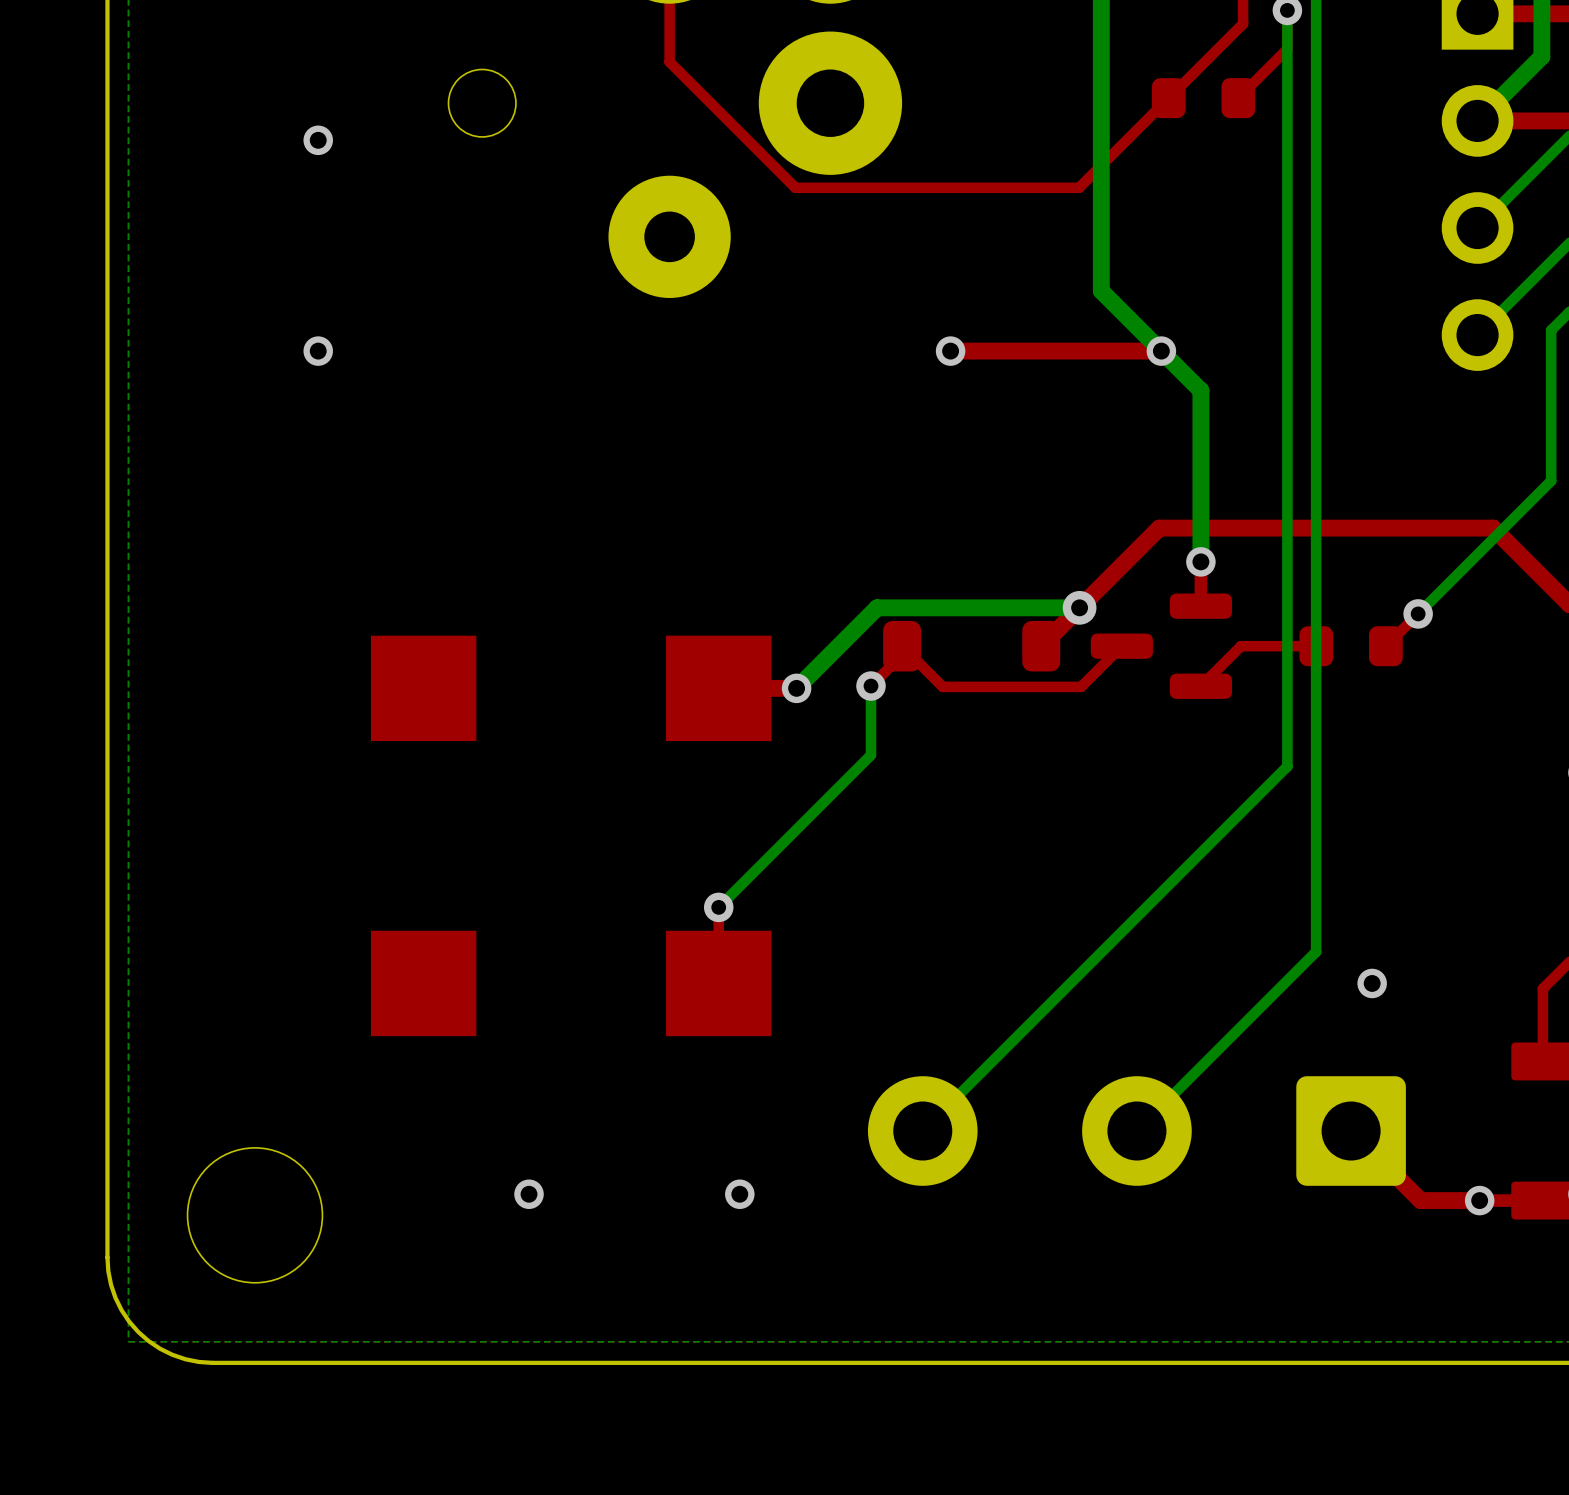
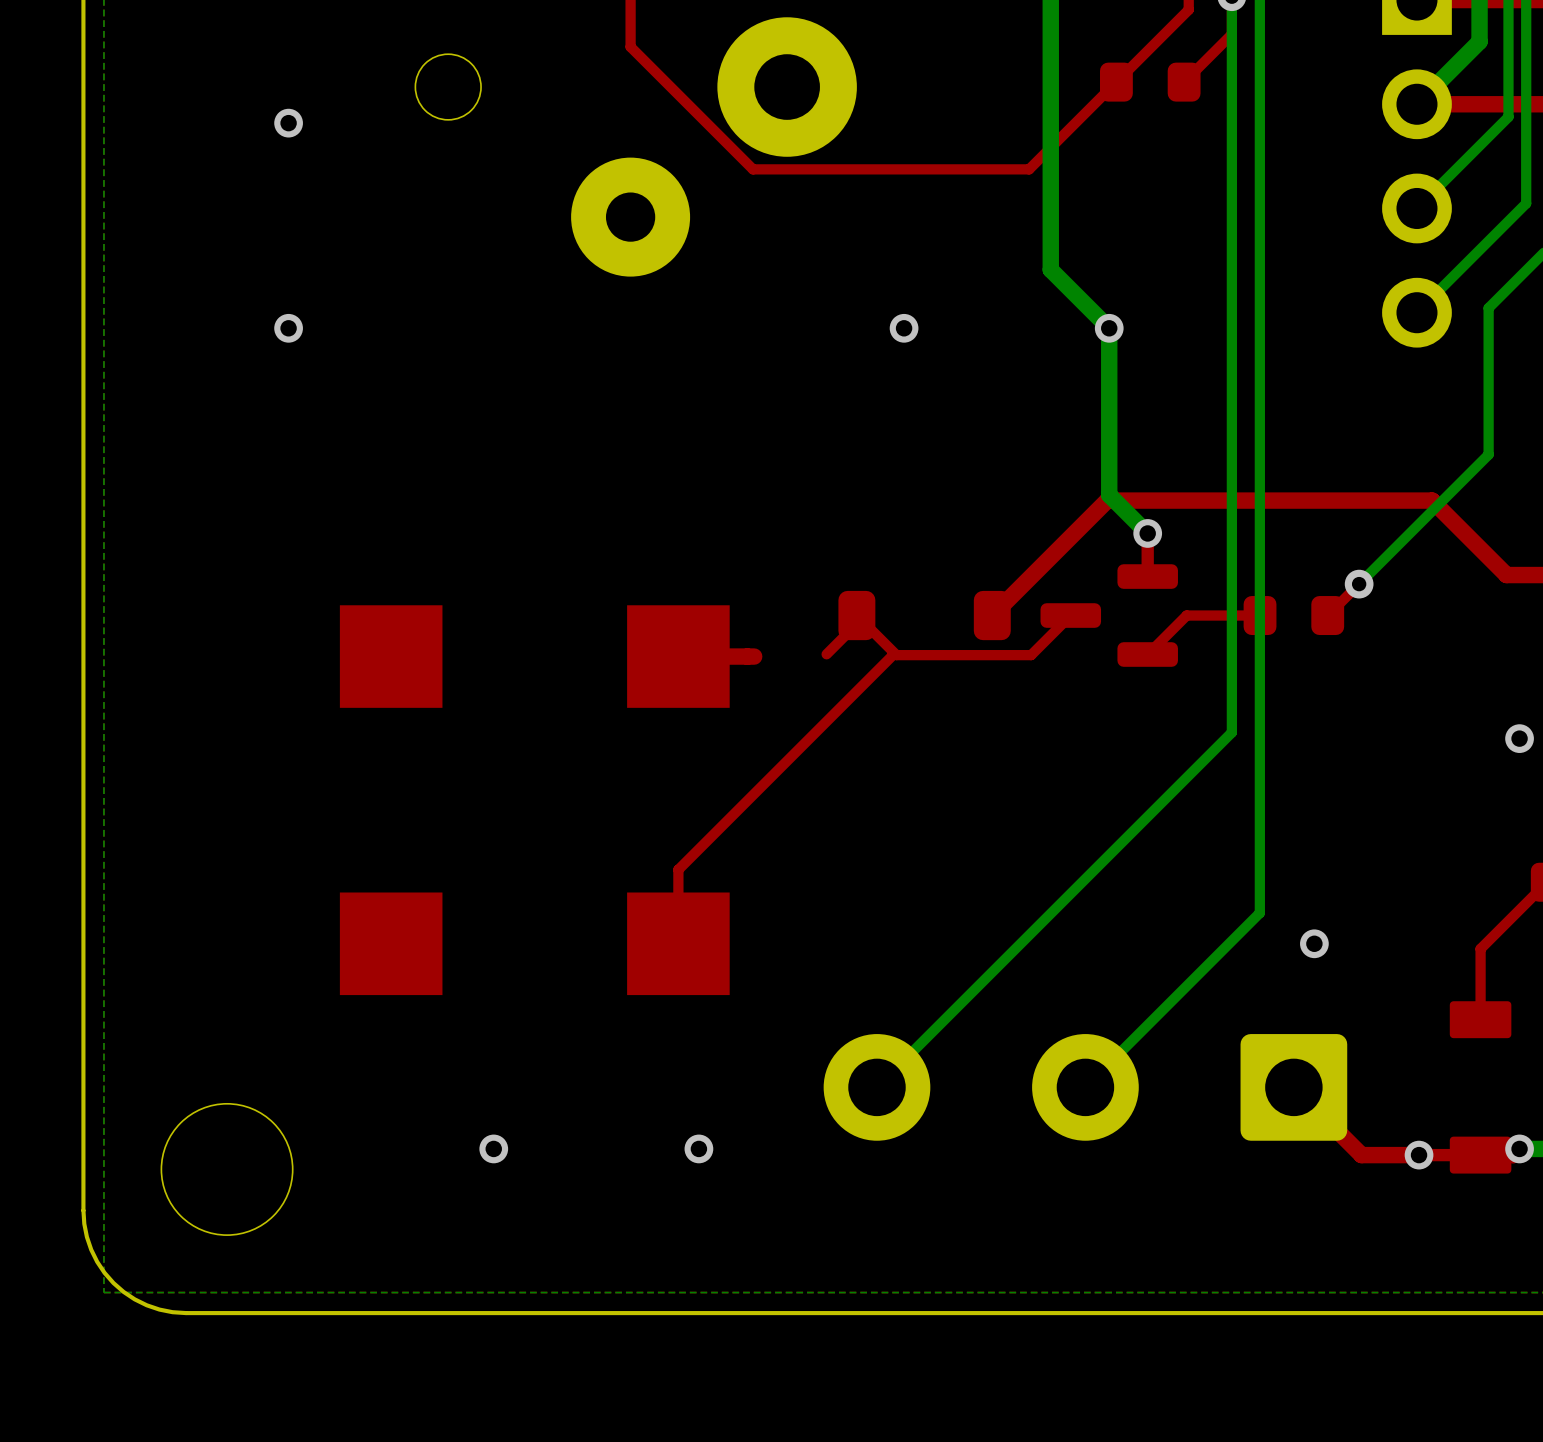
top track: (1161, 351) (950, 351) -> none
bottom track: (1161, 351) (1200, 390) (1200, 561) -> (1109, 328) (1109, 494) (1147, 533)
bottom track: (1079, 607) (877, 607) (796, 688) -> none
via: (1079, 607) -> none
bottom track: (871, 686) (871, 755) (718, 907) -> none
via: (871, 686) -> none
top track: none -> (893, 655) (678, 869)
via: (796, 688) -> none
via: (718, 907) -> none

